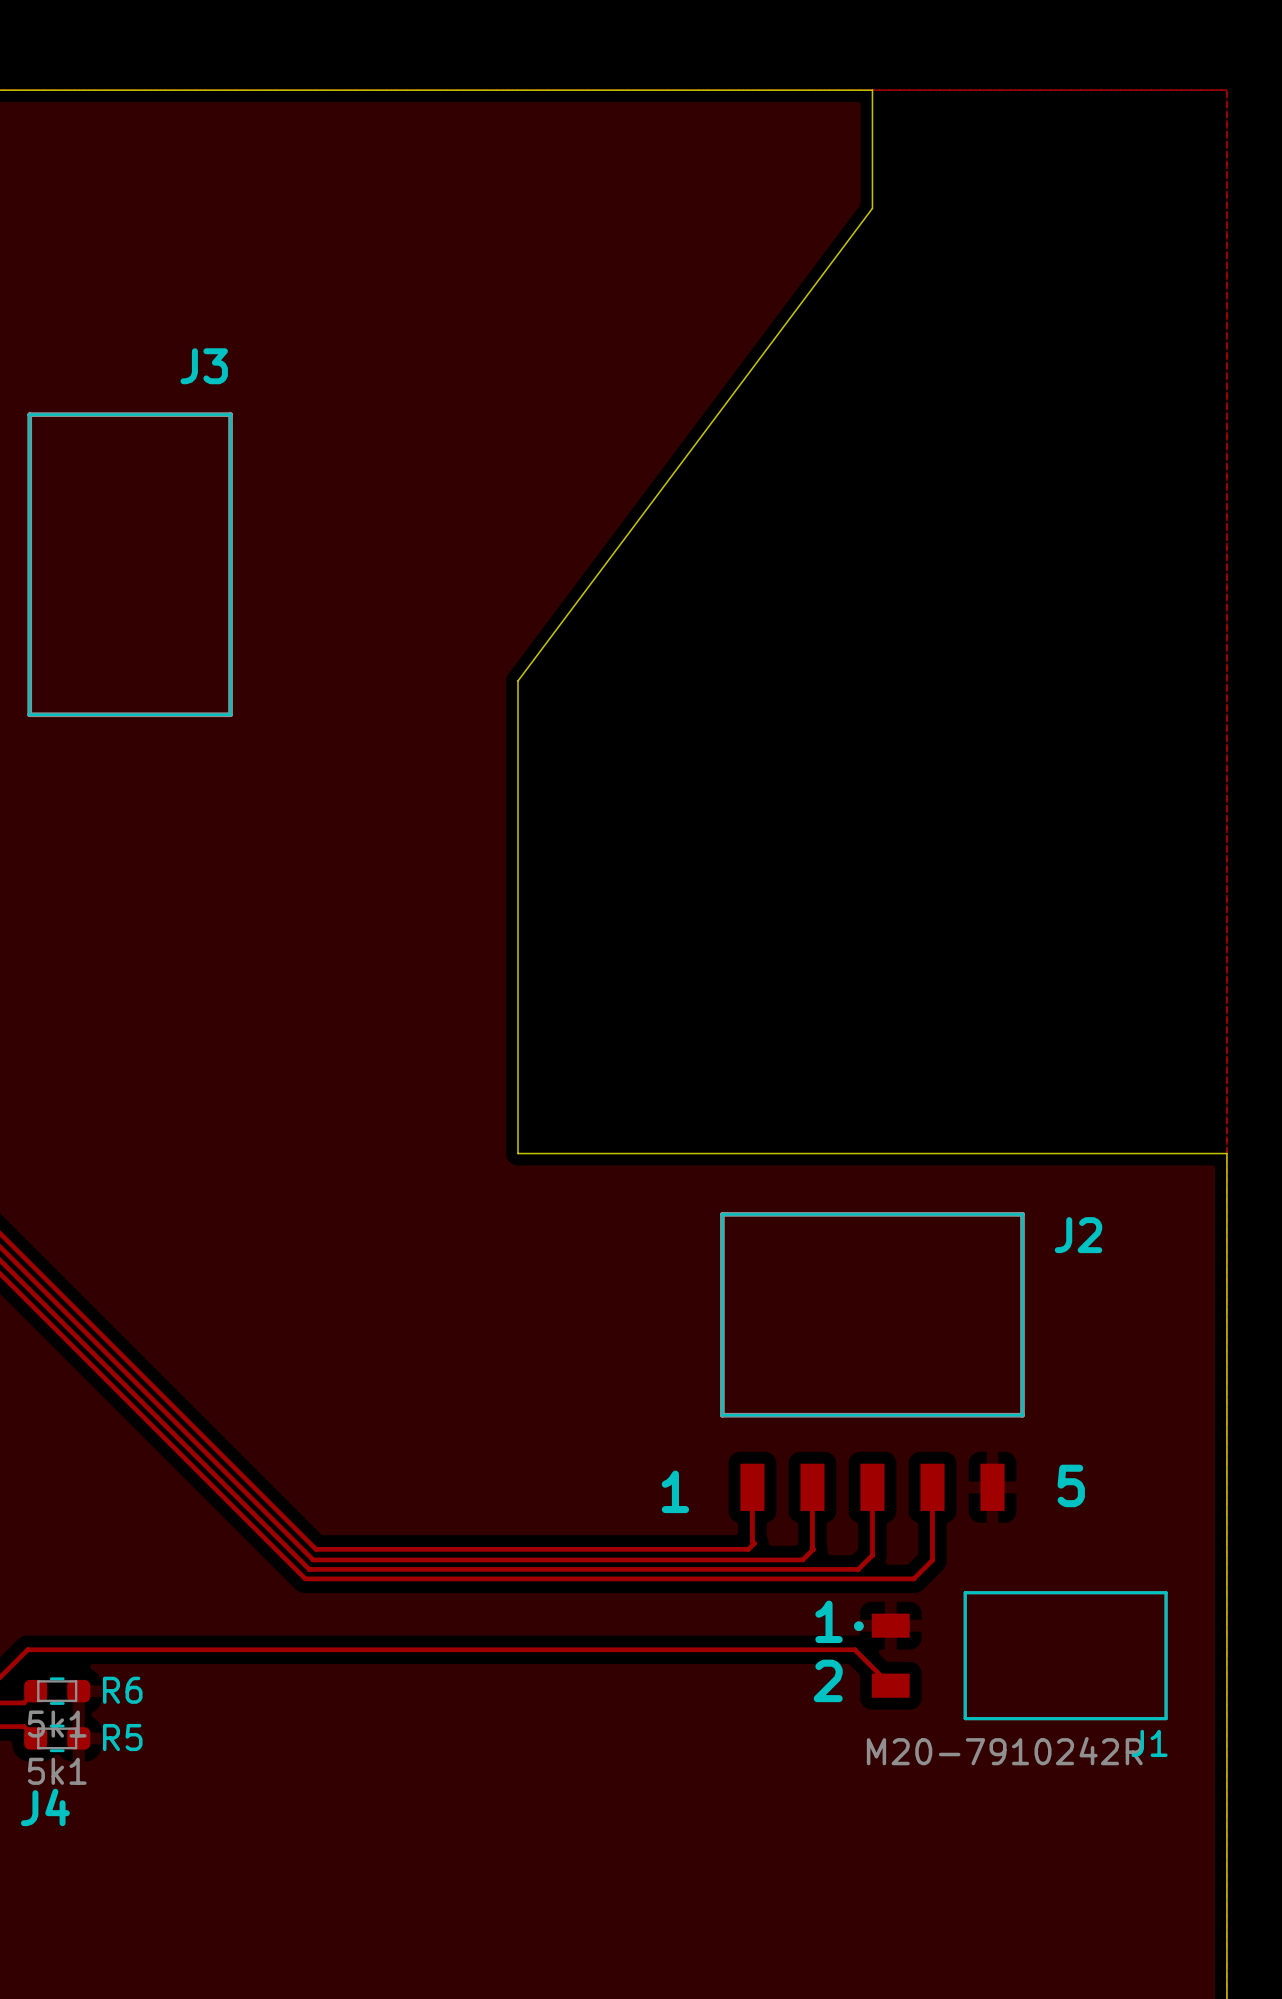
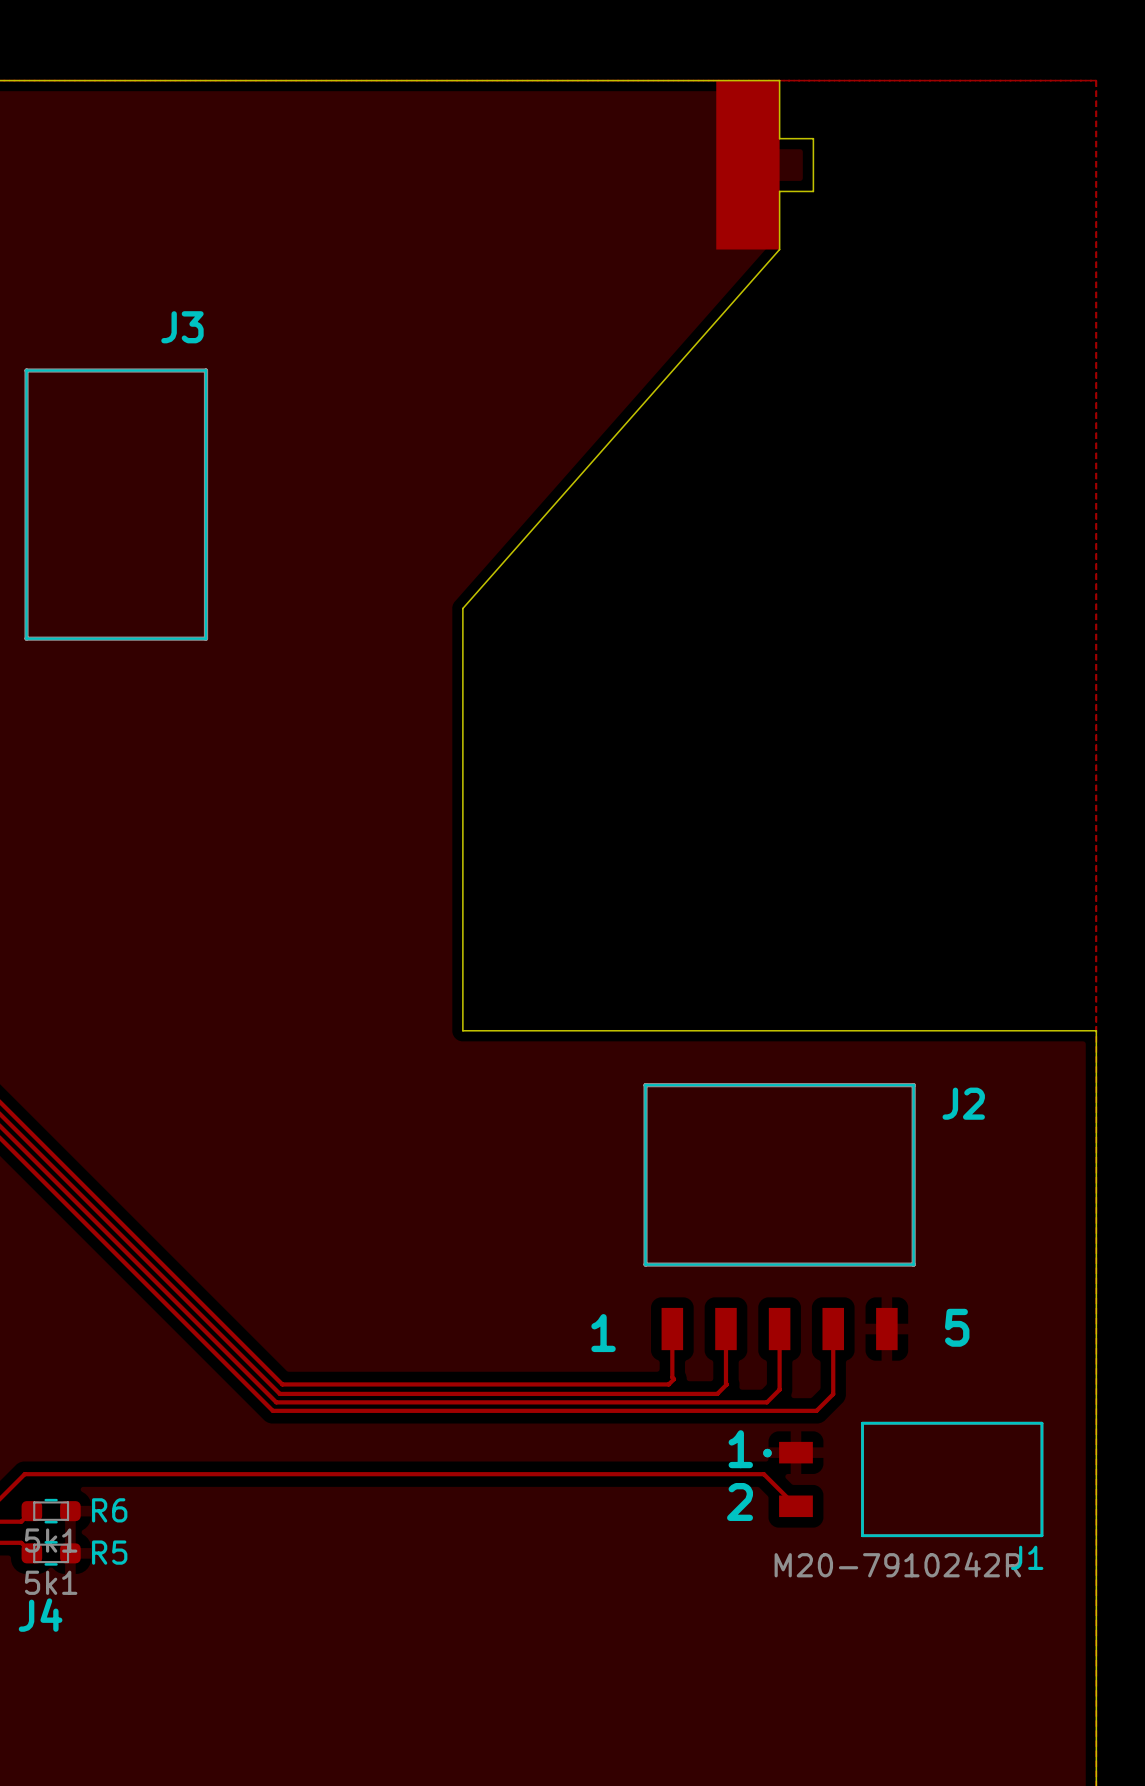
board edge: (872, 155) (872, 208) (518, 680) -> (779, 138) (813, 138) (813, 191) (779, 191) (779, 249) (462, 608)
part: none -> (747, 165)

